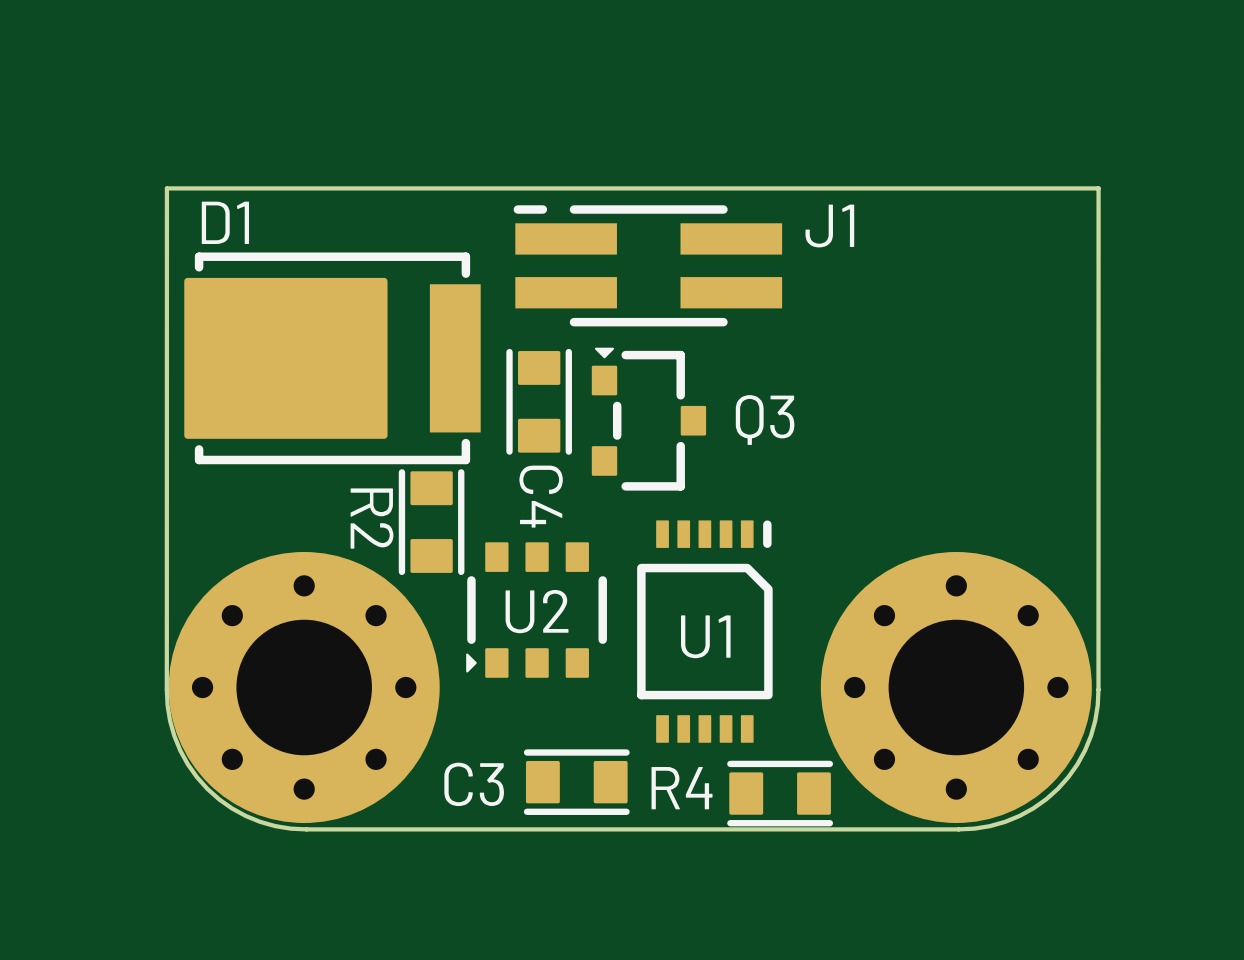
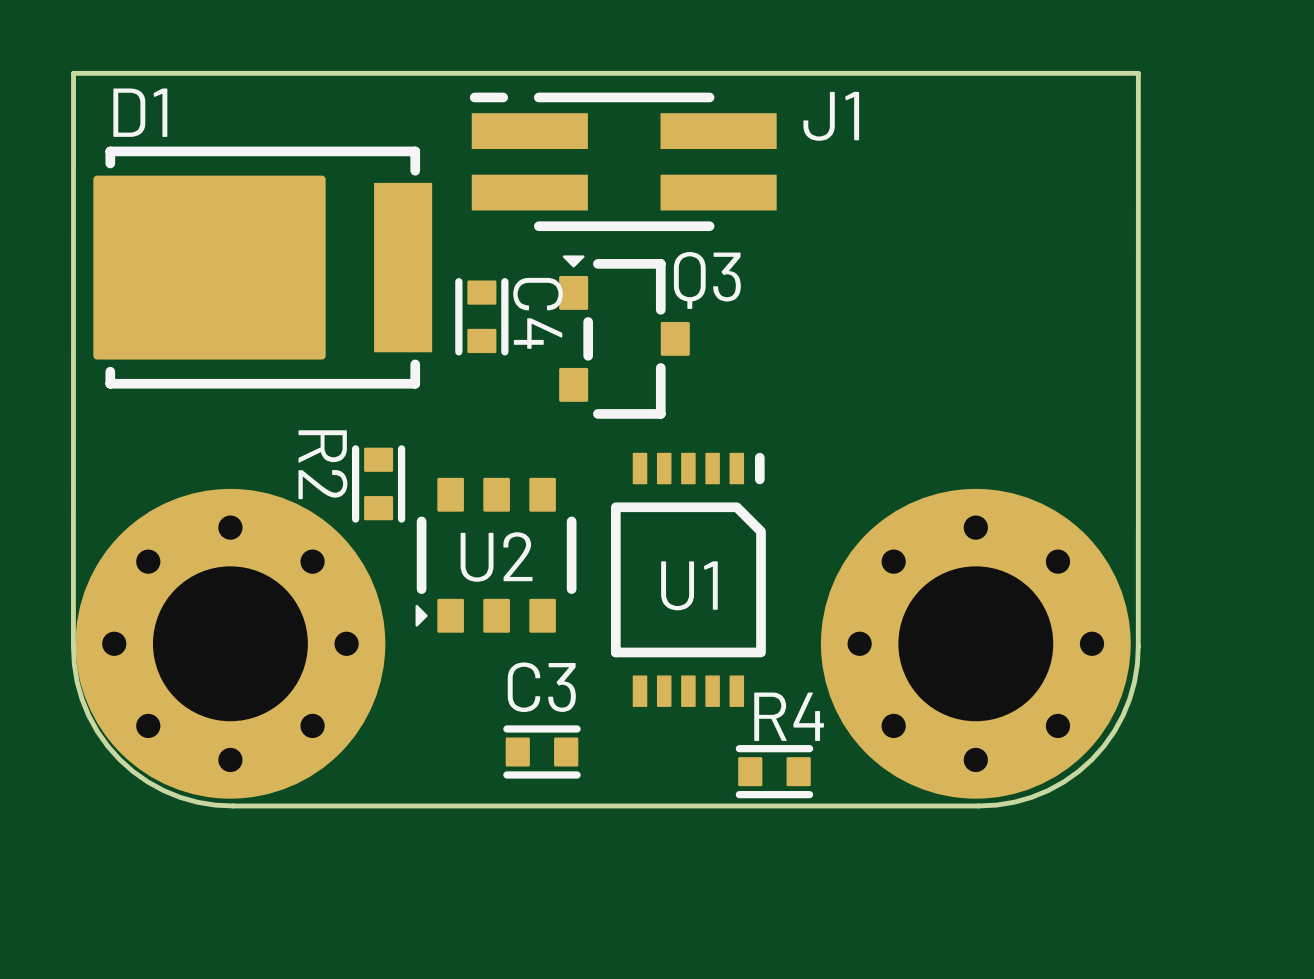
C4 footprint: [506, 348, 572, 455] -> [455, 278, 509, 356]
Q3 name position: Q3 (765, 420) -> Q3 (707, 280)
R2 footprint: [398, 469, 465, 576] -> [351, 445, 406, 523]
C4 name position: C4 (541, 496) -> C4 (538, 313)
C3 footprint: [523, 749, 630, 815] -> [503, 725, 581, 779]
R4 footprint: [727, 760, 834, 827] -> [735, 745, 814, 799]
C3 name position: C3 (474, 784) -> C3 (541, 687)
R4 name position: R4 (682, 788) -> R4 (789, 716)

